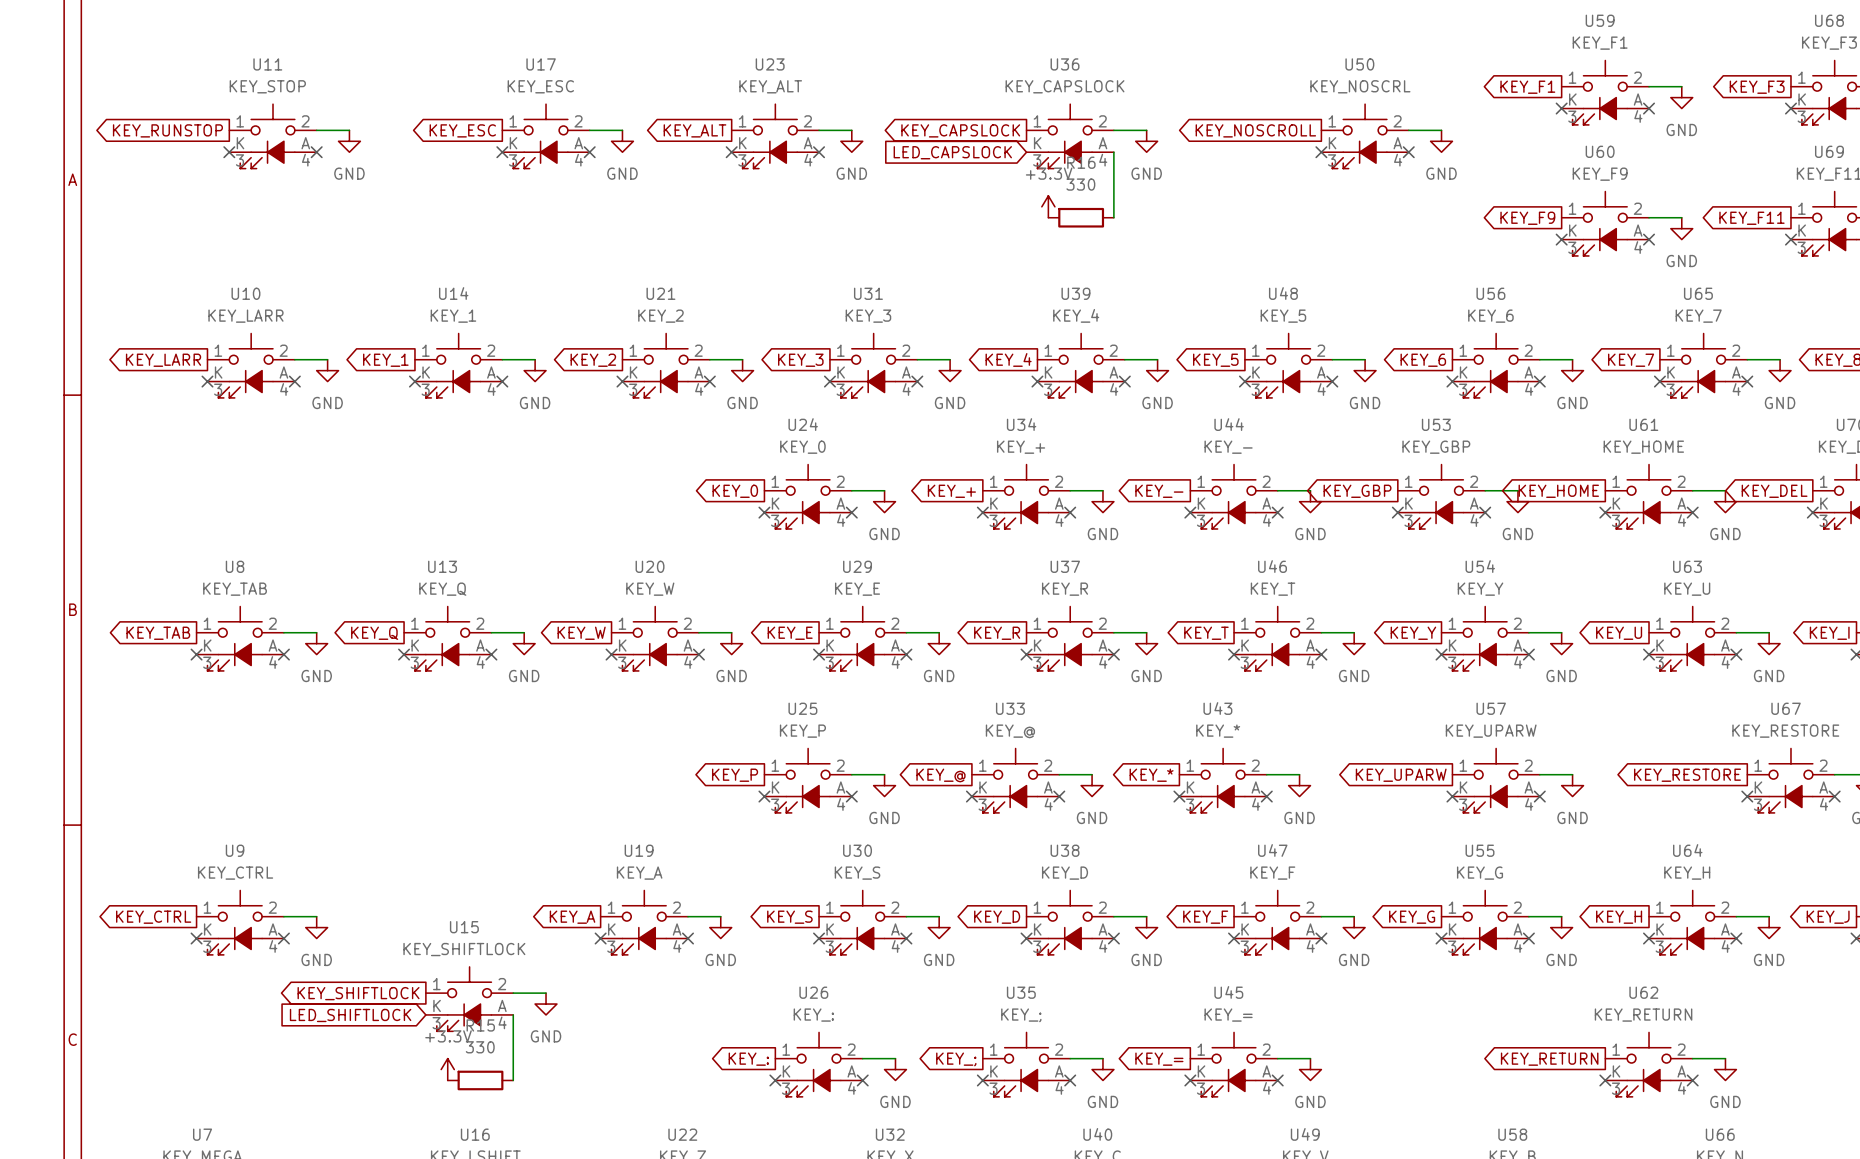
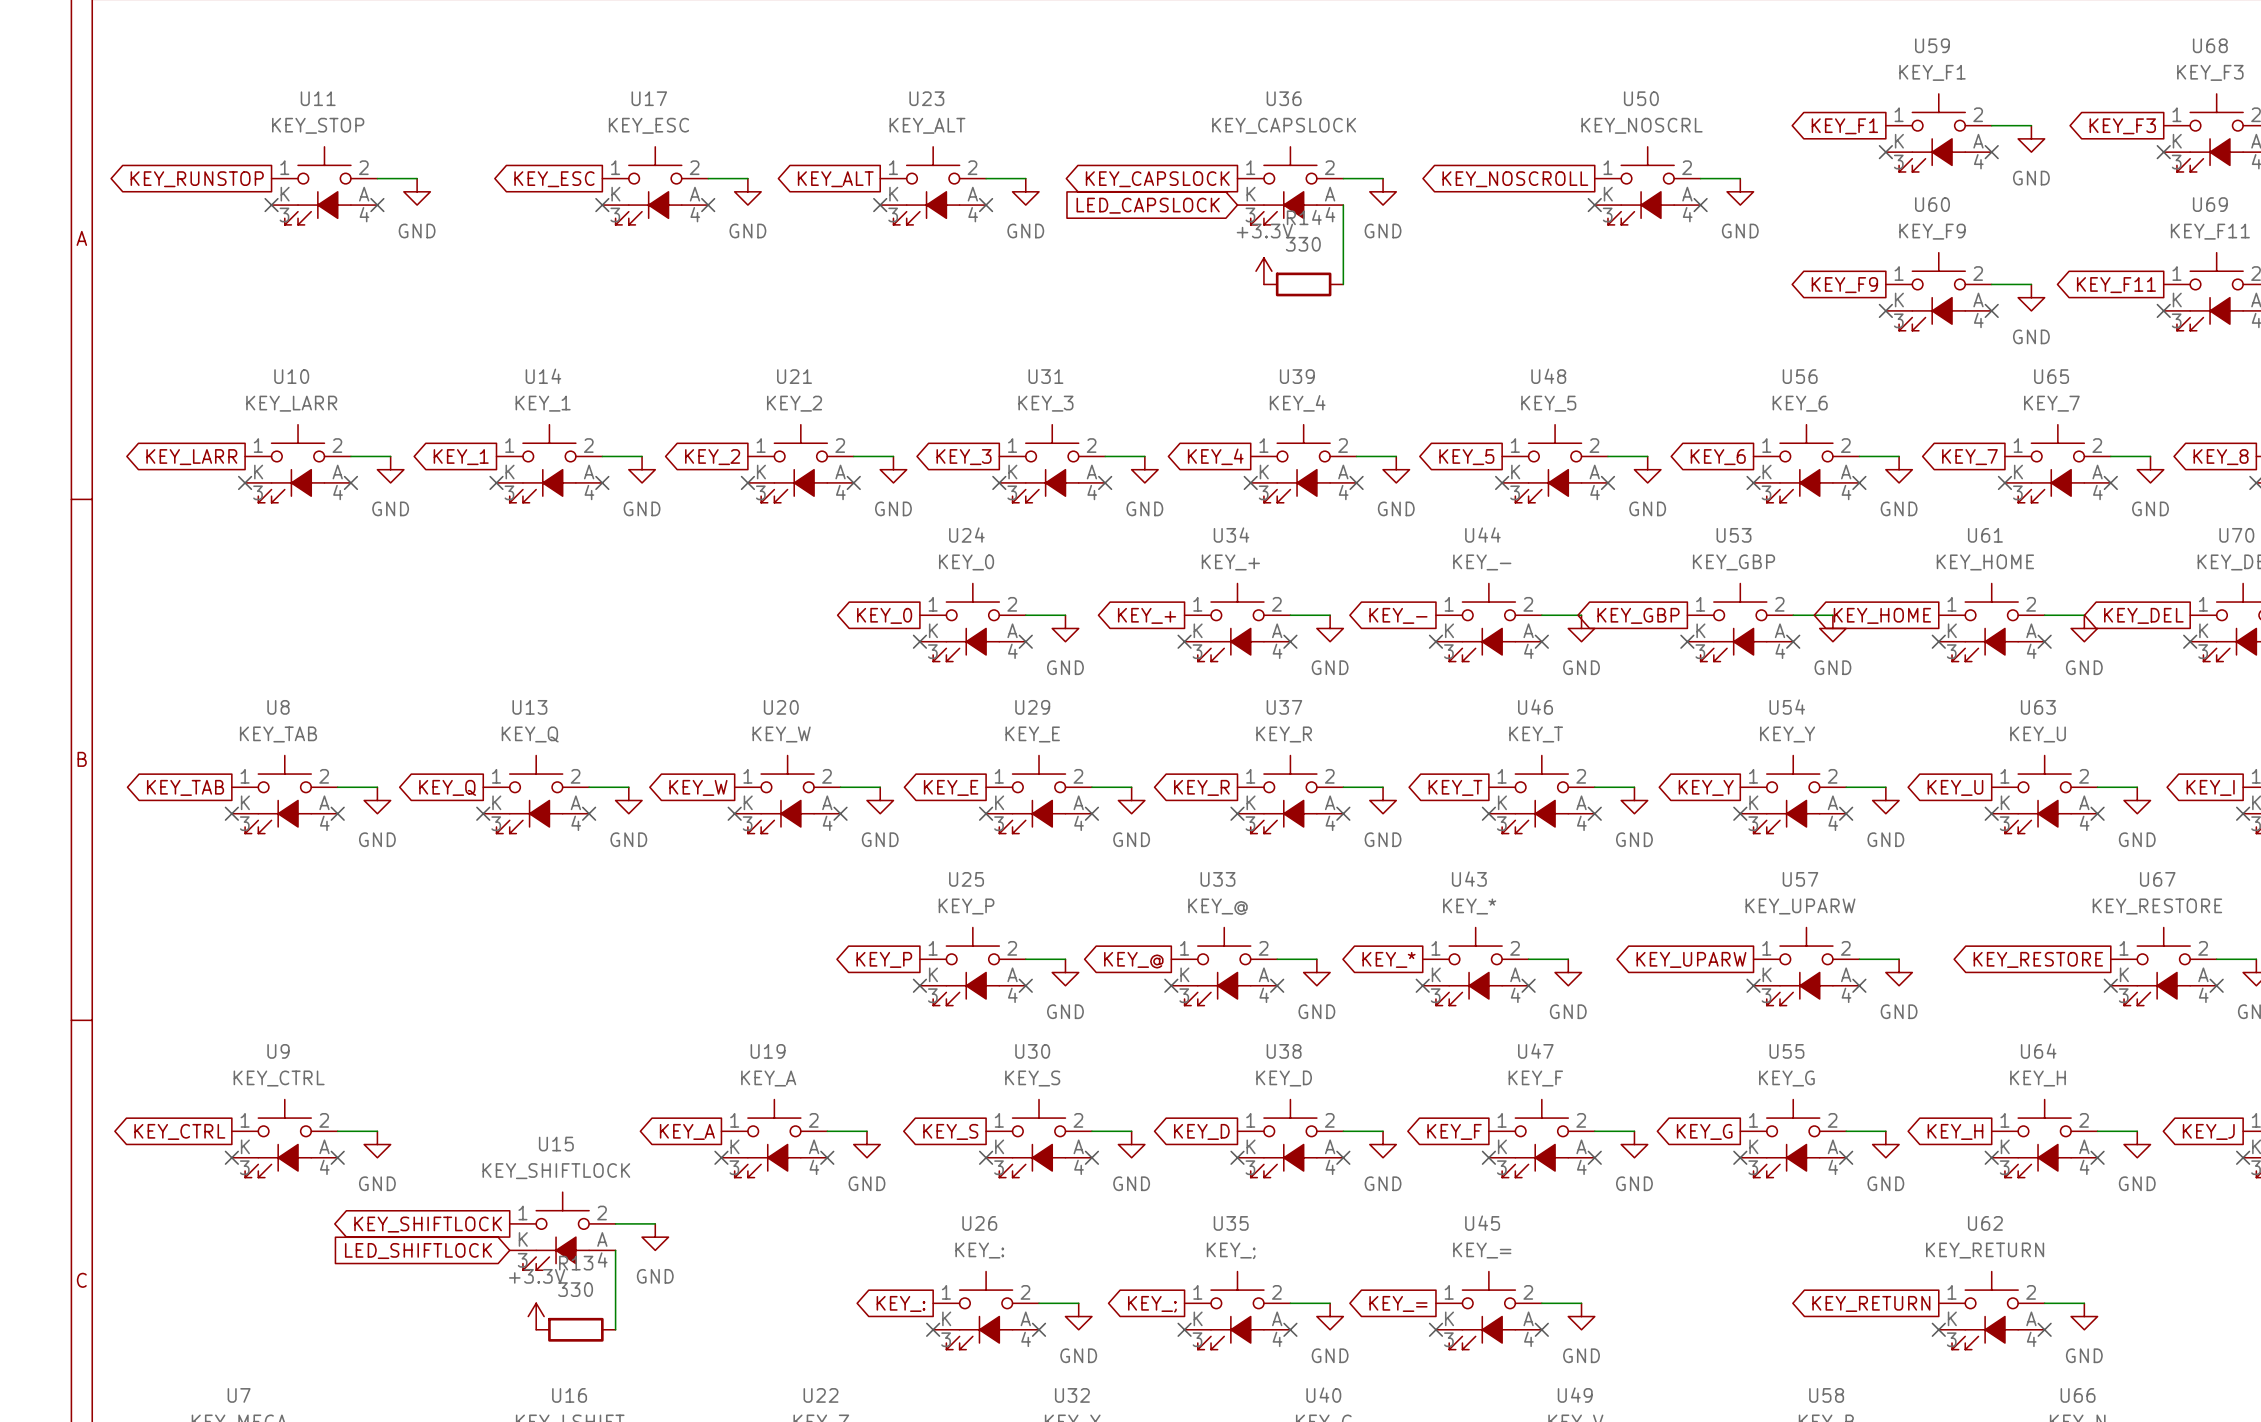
R16 name: R16 (1081, 162) -> R14 (1304, 217)
R15 name: R15 (480, 1025) -> R13 (576, 1263)

